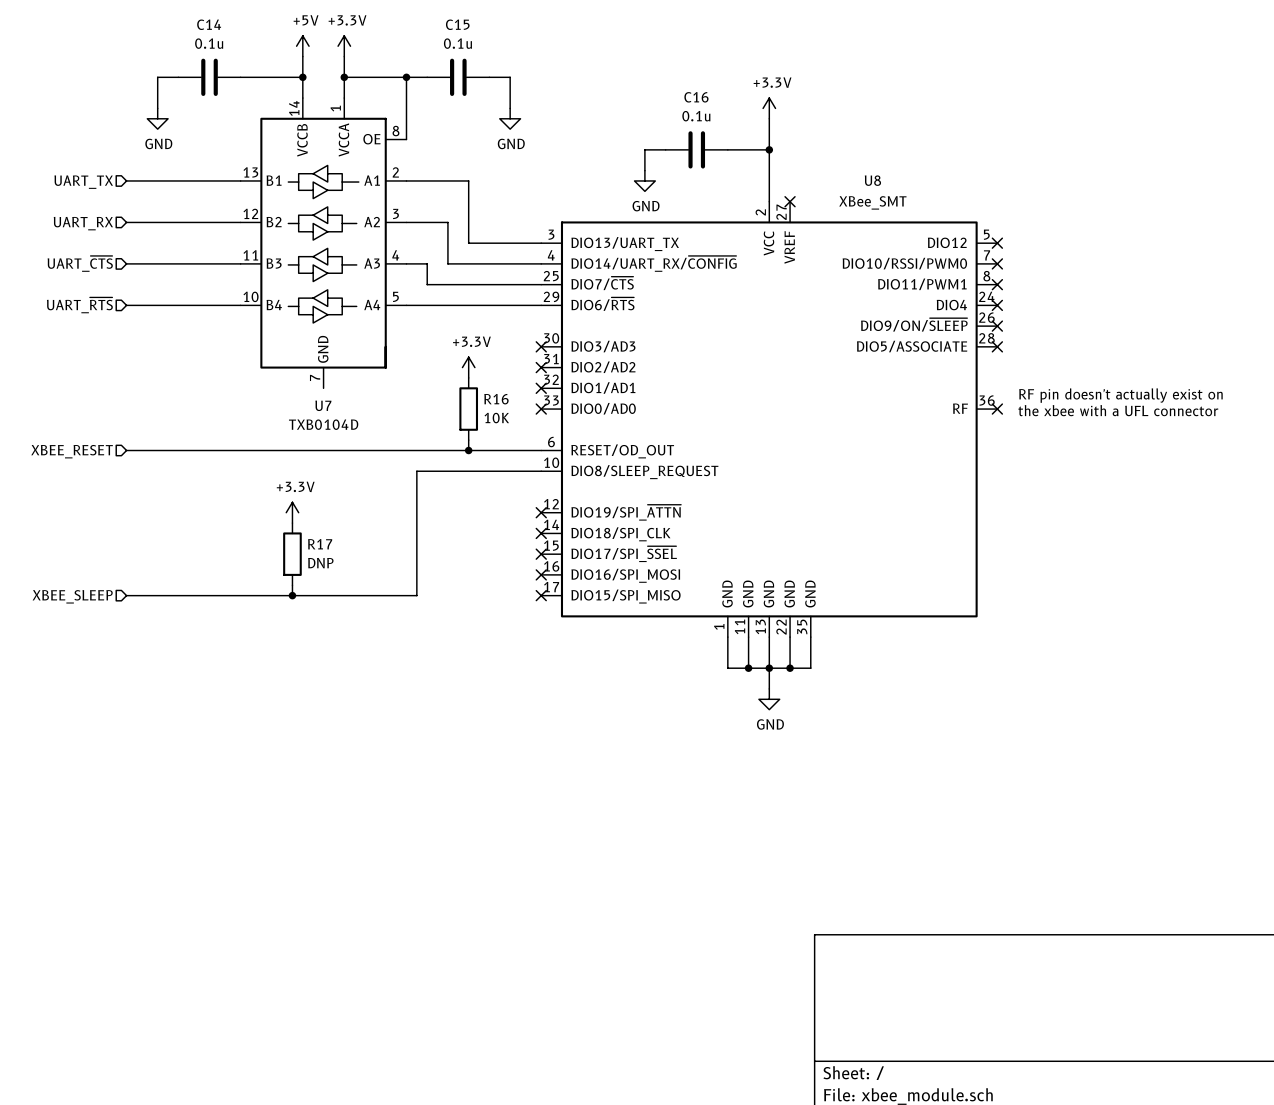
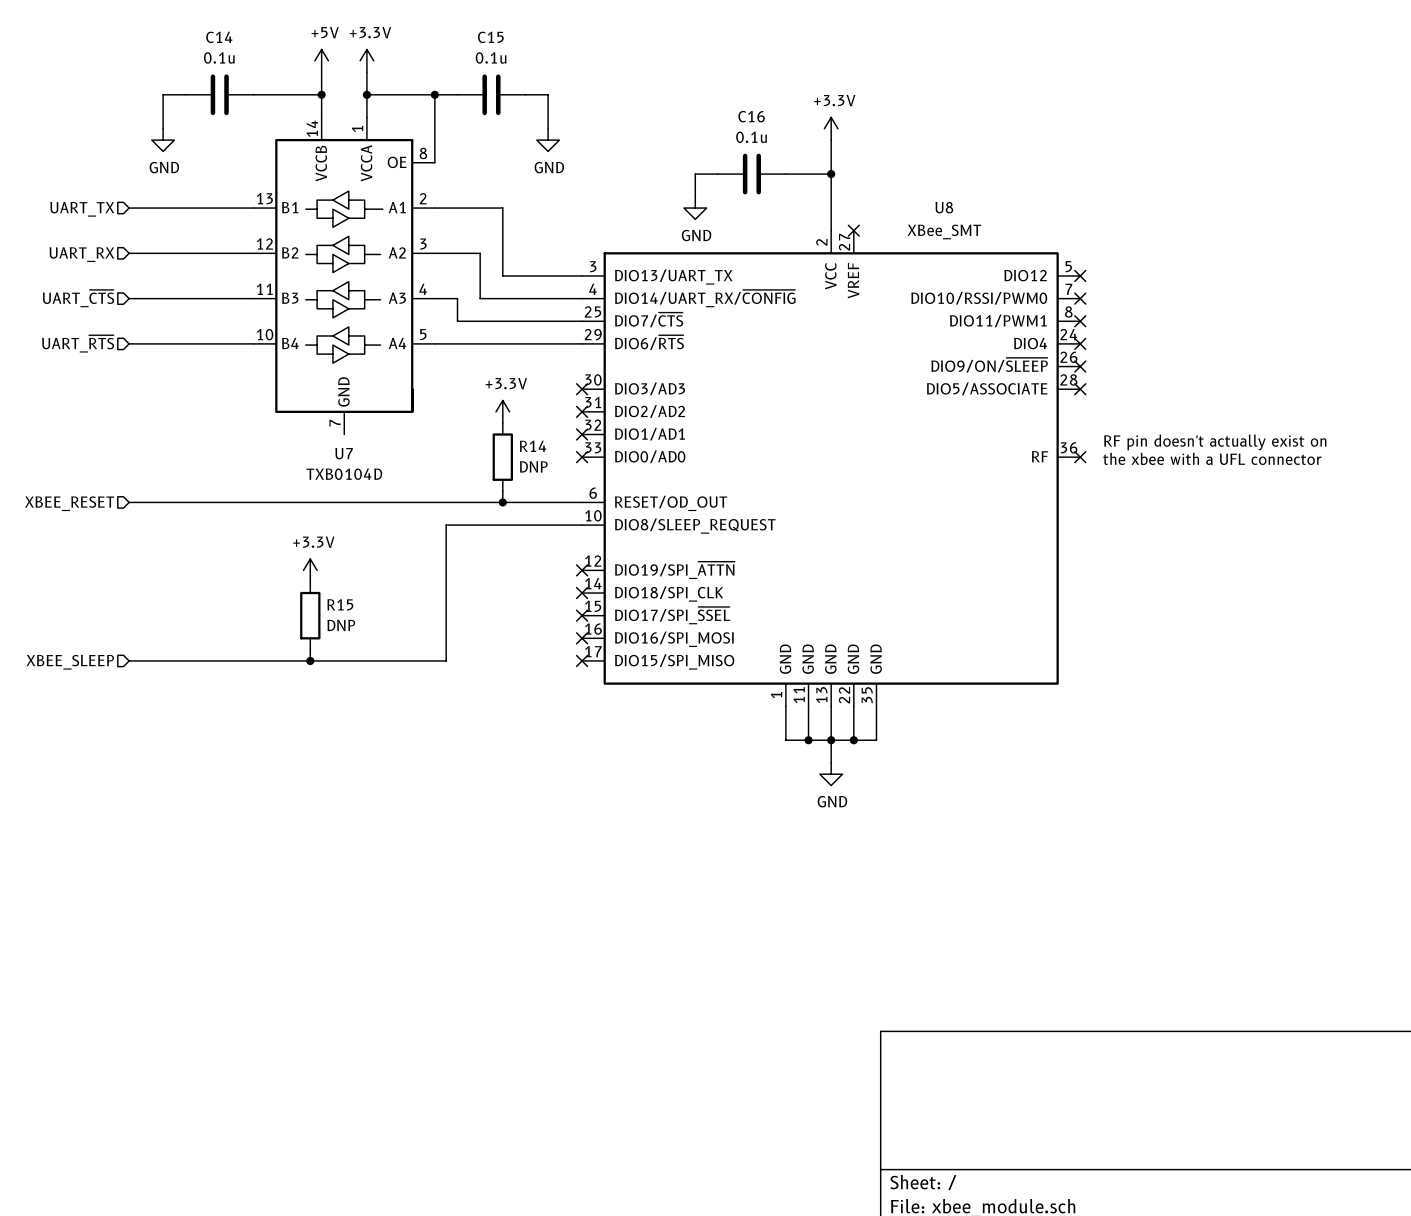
R16 name: R16 (496, 399) -> R14 (533, 446)
R16 value: 10K (496, 418) -> DNP (533, 466)
R17 name: R17 (320, 544) -> R15 (340, 604)

